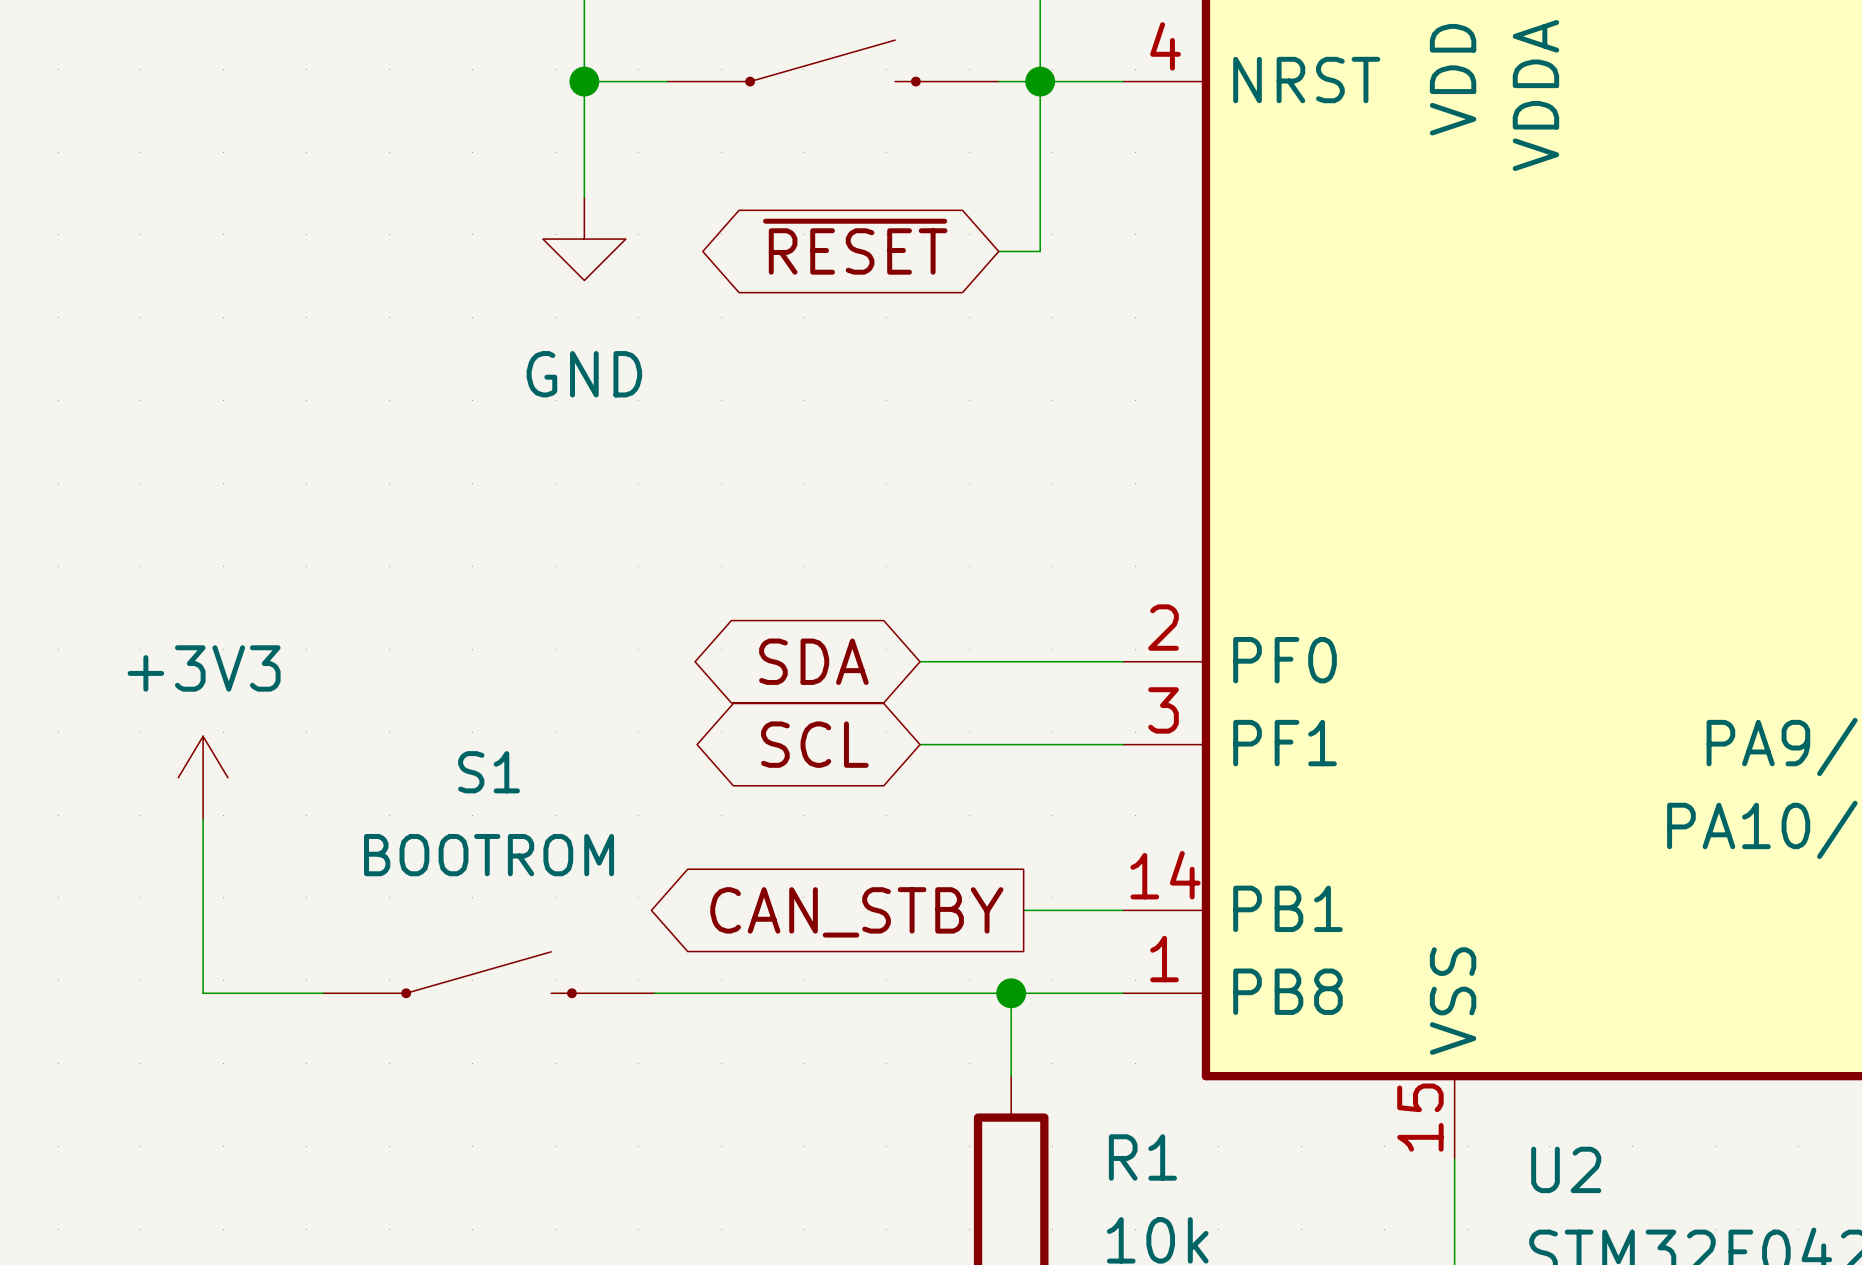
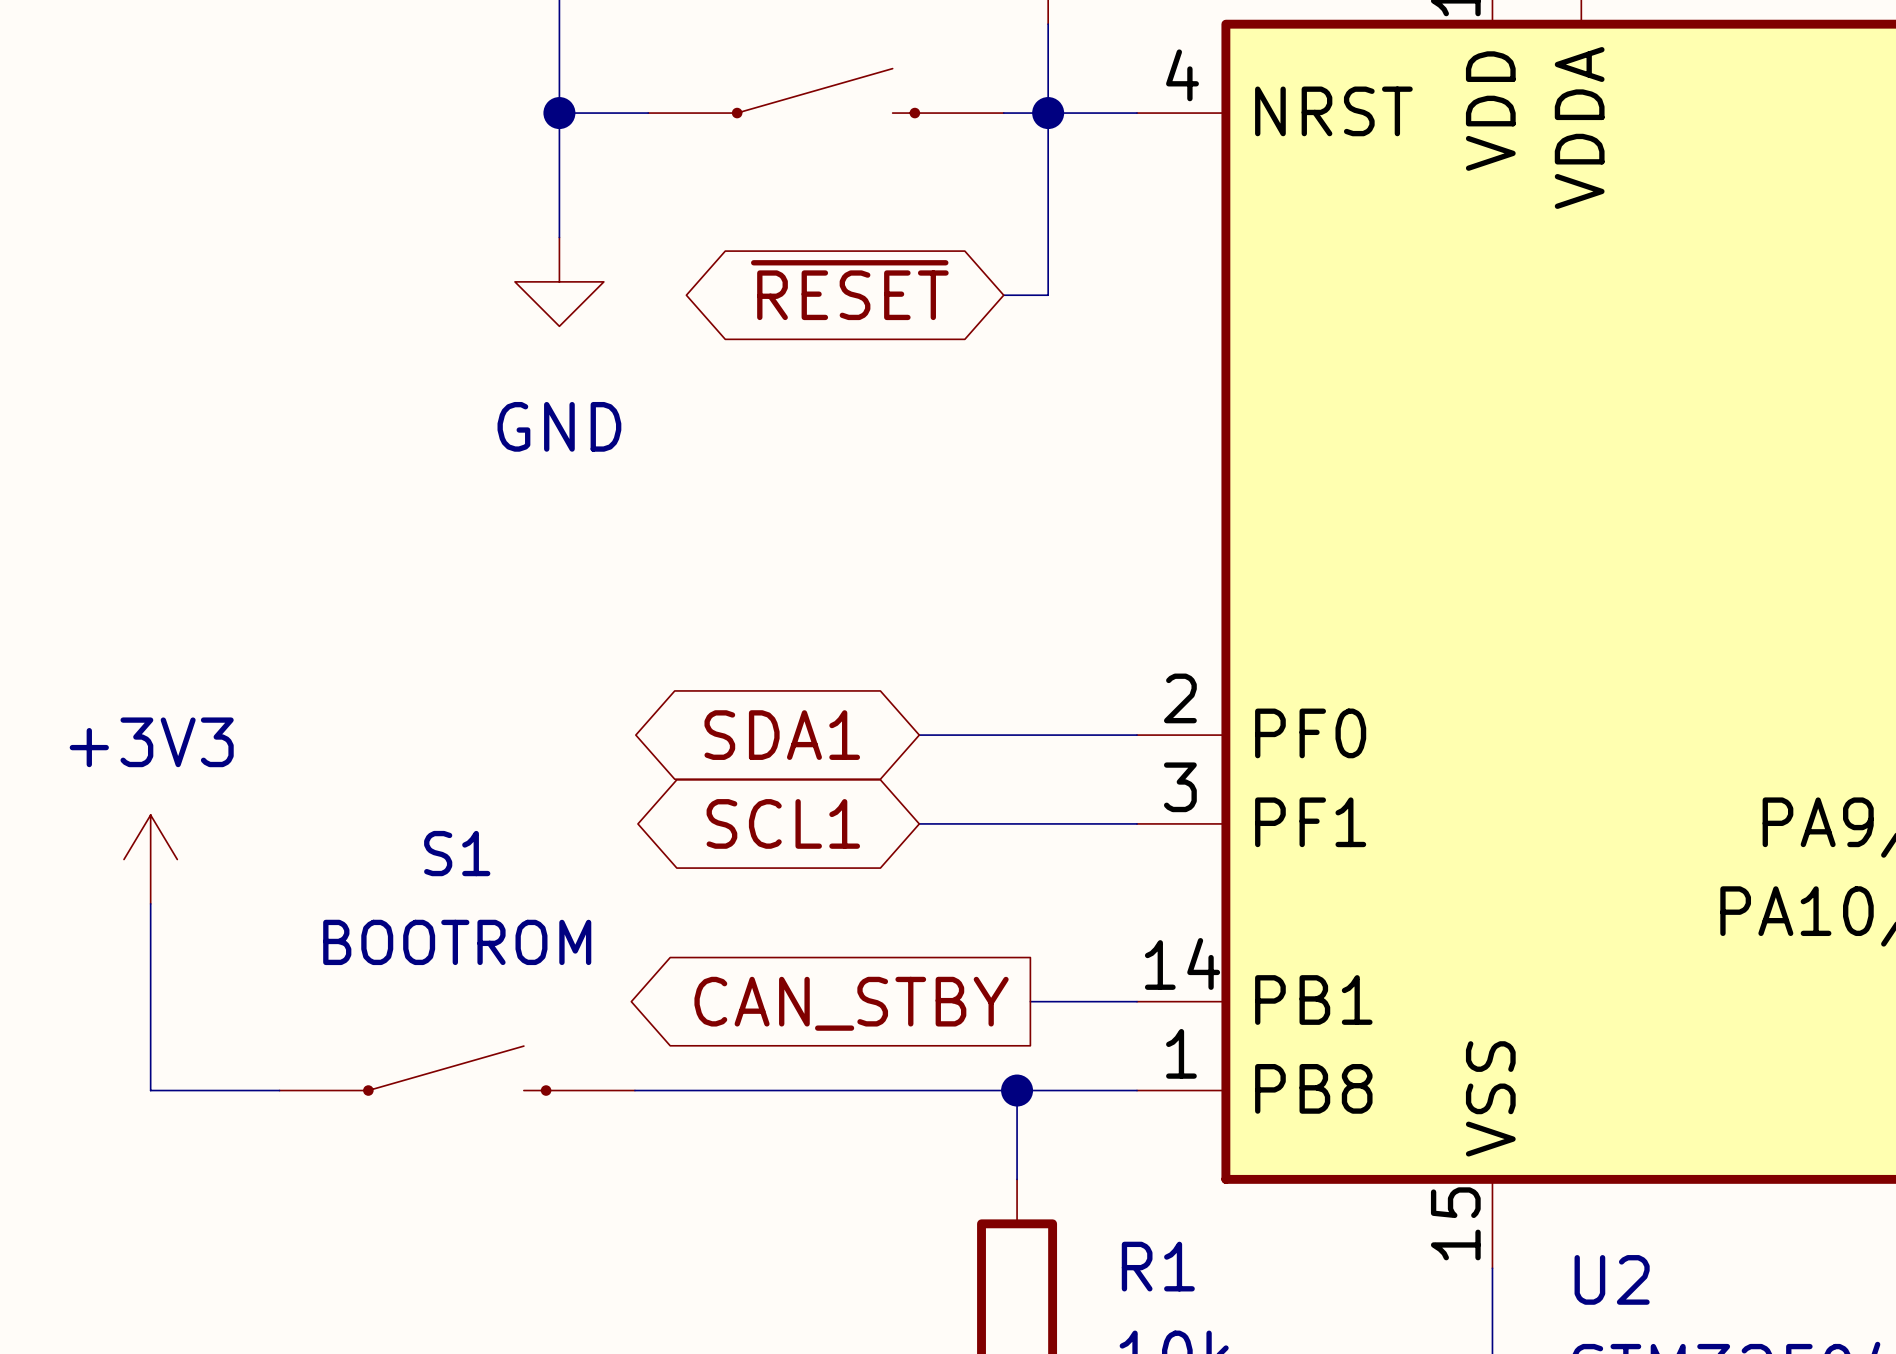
global label: SDA (813, 661) -> SDA1 (782, 735)
global label: SCL (814, 744) -> SCL1 (783, 823)

